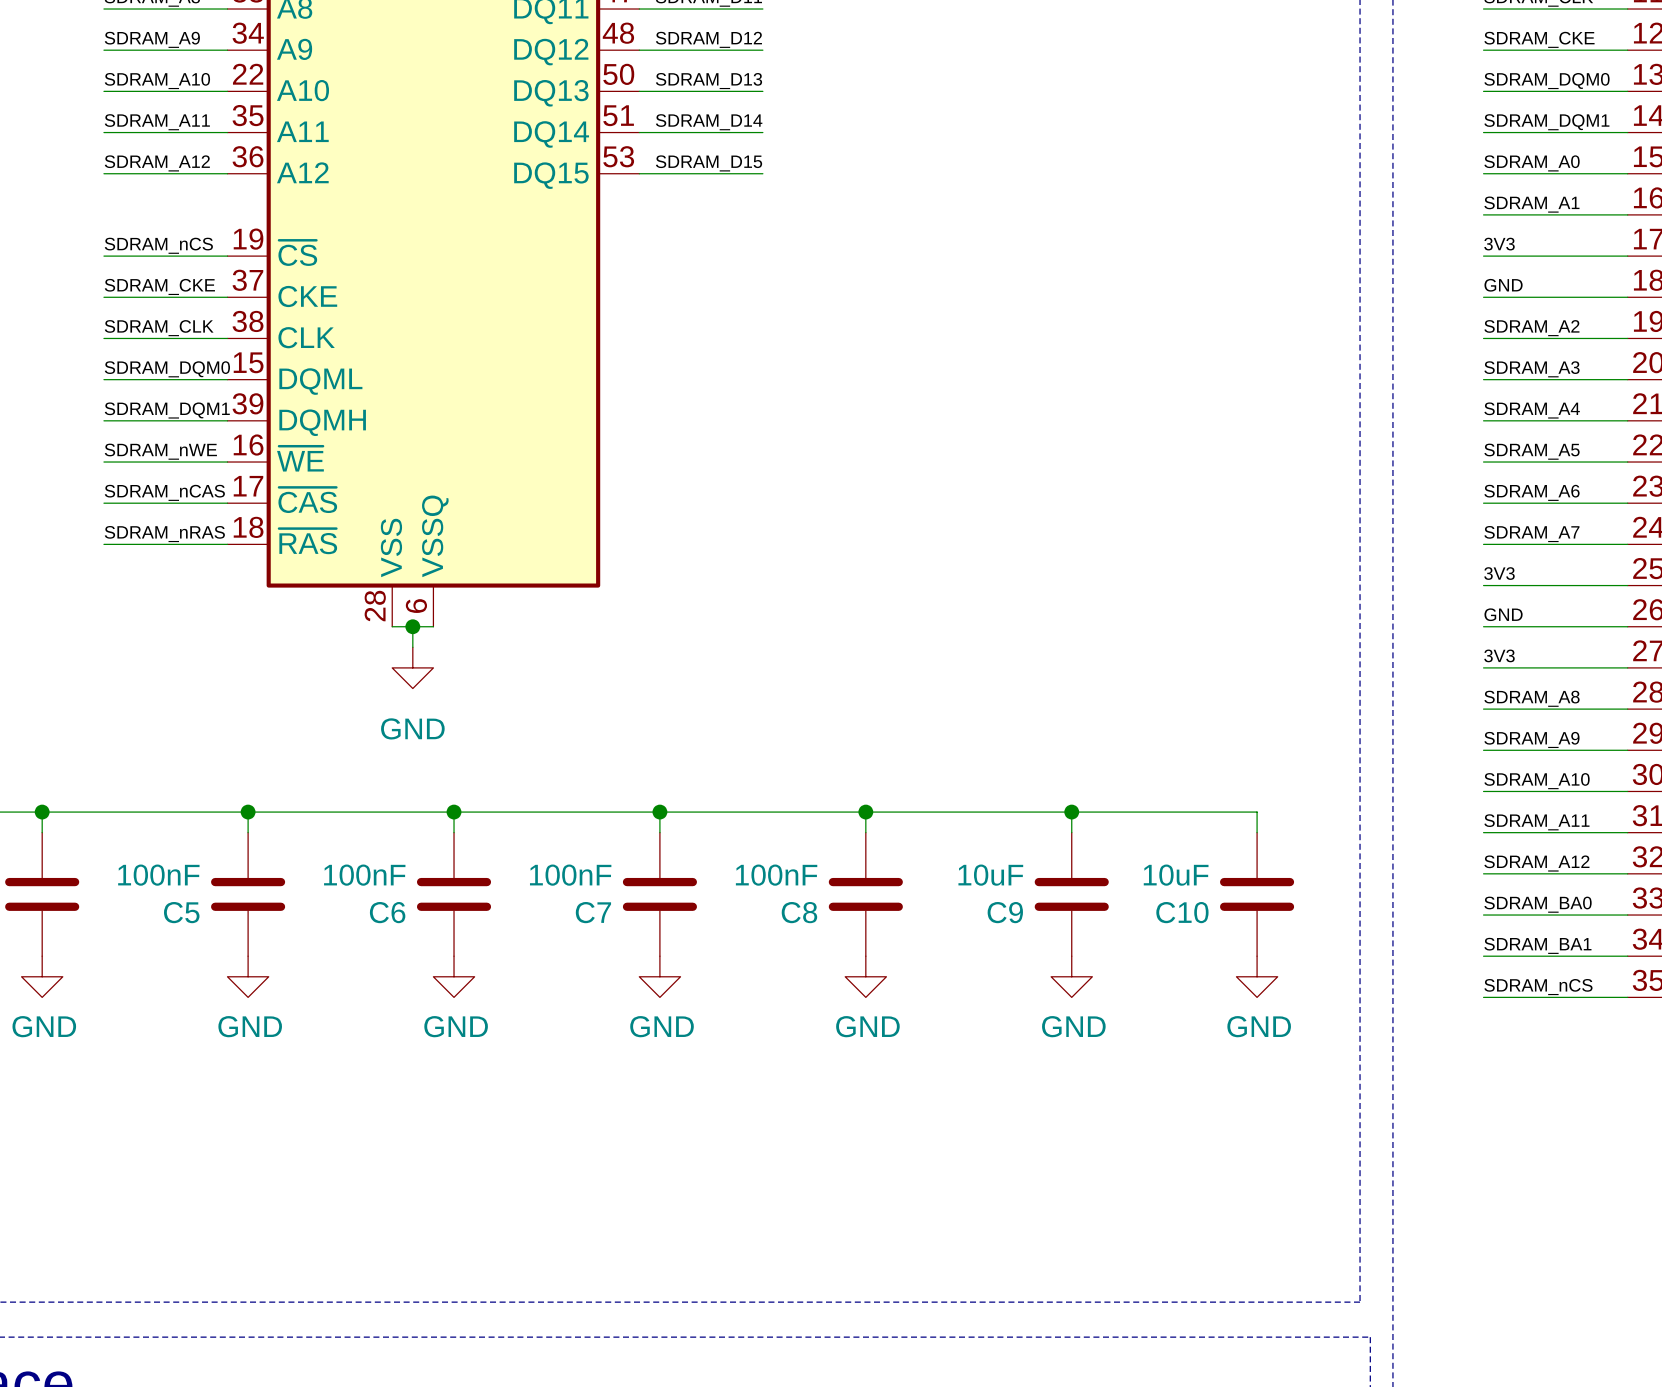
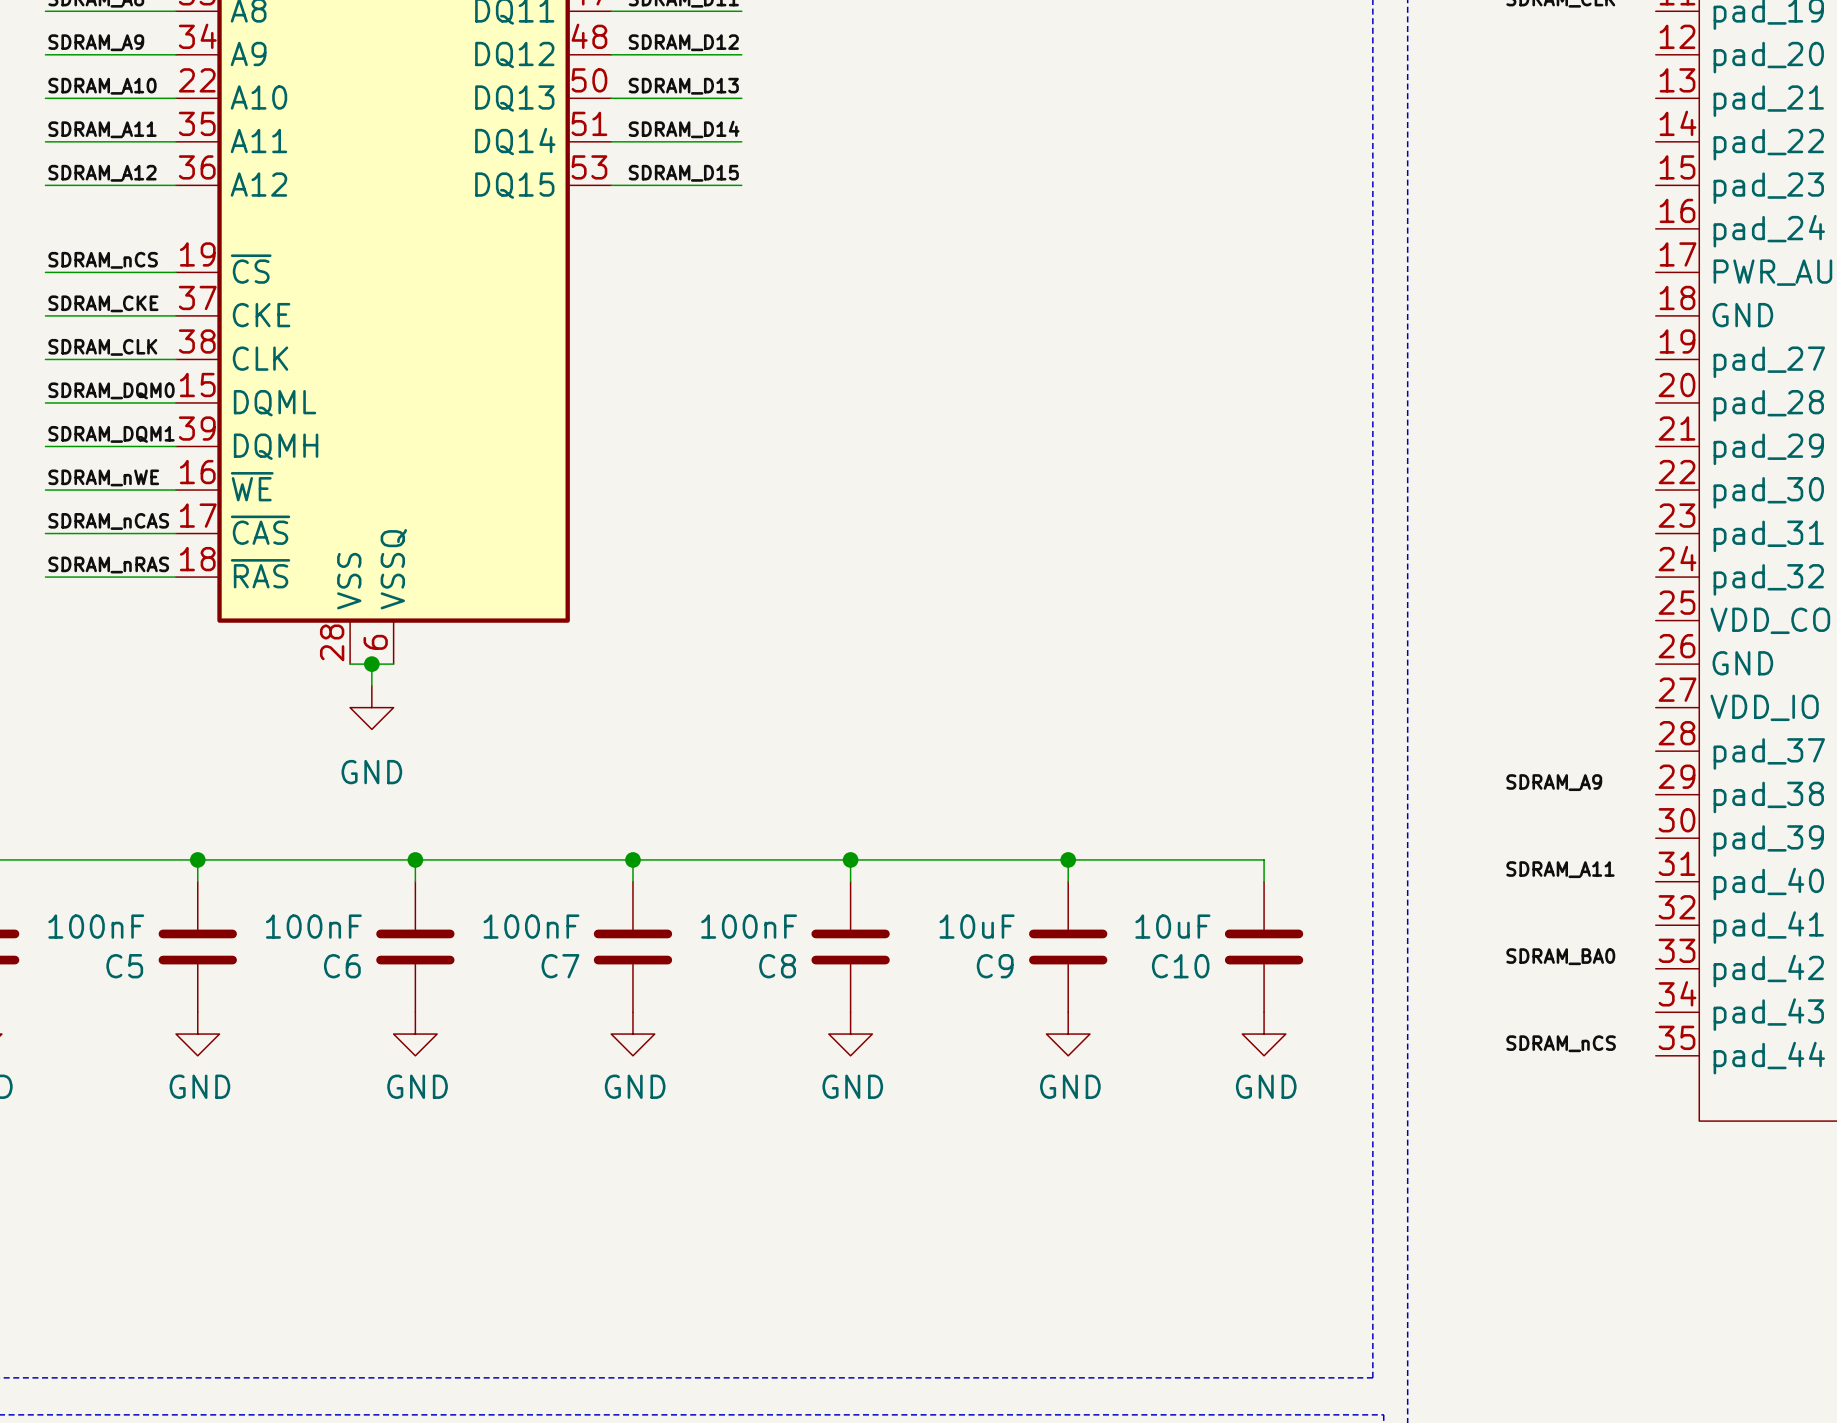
wire: (1483, 9) (1627, 9) -> none
label: SDRAM_CKE (1539, 39) -> none
wire: (1483, 50) (1627, 50) -> none
label: SDRAM_DQM0 (1546, 81) -> none
wire: (1483, 91) (1627, 91) -> none
label: SDRAM_DQM1 (1546, 122) -> none
wire: (1483, 132) (1627, 132) -> none
label: SDRAM_A0 (1532, 163) -> none
wire: (1483, 173) (1627, 173) -> none
label: SDRAM_A1 (1531, 204) -> none
wire: (1483, 214) (1627, 214) -> none
label: 3V3 (1499, 244) -> none
wire: (1483, 256) (1627, 256) -> none
label: GND (1503, 285) -> none
wire: (1483, 297) (1627, 297) -> none
label: SDRAM_A2 (1531, 328) -> none
wire: (1483, 338) (1627, 338) -> none
label: SDRAM_A3 (1531, 369) -> none
wire: (1483, 379) (1627, 379) -> none
label: SDRAM_A4 (1532, 410) -> none
wire: (1483, 420) (1627, 420) -> none
label: SDRAM_A5 (1532, 451) -> none
wire: (1483, 462) (1627, 462) -> none
label: SDRAM_A6 (1531, 492) -> none
wire: (1483, 503) (1627, 503) -> none
label: SDRAM_A7 (1531, 534) -> none
wire: (1483, 544) (1627, 544) -> none
label: 3V3 (1499, 573) -> none
wire: (1483, 585) (1627, 585) -> none
label: GND (1503, 614) -> none
wire: (1483, 626) (1627, 626) -> none
label: 3V3 (1499, 655) -> none
wire: (1483, 667) (1627, 667) -> none
label: SDRAM_A8 (1531, 698) -> none
wire: (1483, 709) (1627, 709) -> none
wire: (1483, 750) (1627, 750) -> none
label: SDRAM_A10 (1537, 781) -> none
wire: (1483, 791) (1627, 791) -> none
wire: (1483, 832) (1627, 832) -> none
label: SDRAM_A12 (1536, 863) -> none
wire: (1483, 873) (1627, 873) -> none
wire: (1483, 915) (1627, 915) -> none
label: SDRAM_BA1 (1537, 945) -> none
wire: (1483, 956) (1627, 956) -> none
wire: (1483, 997) (1627, 997) -> none

